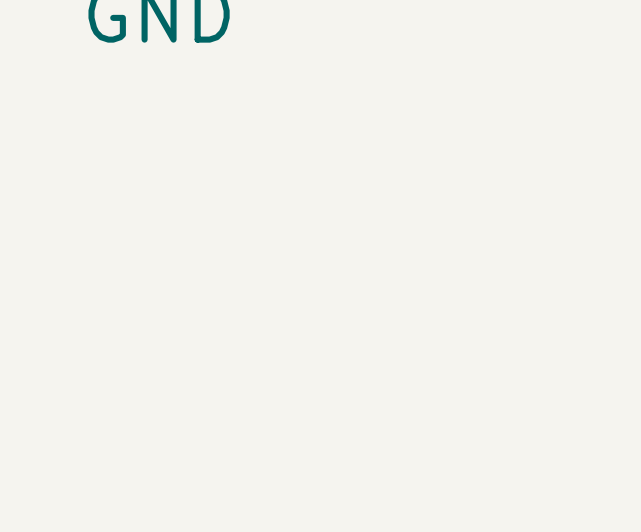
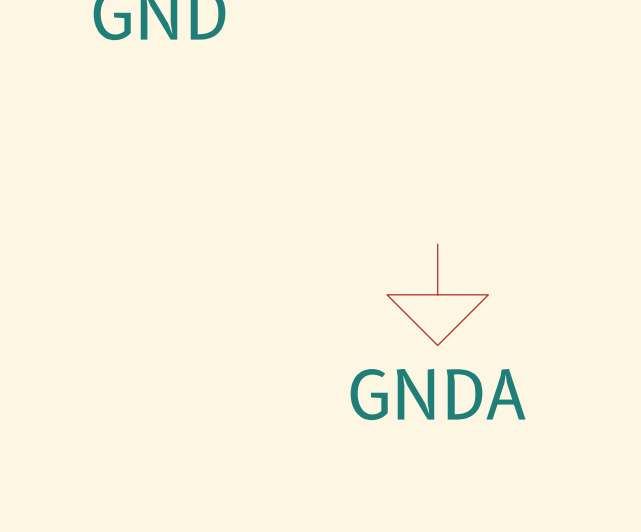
power symbol: none -> GNDA (437, 294)

